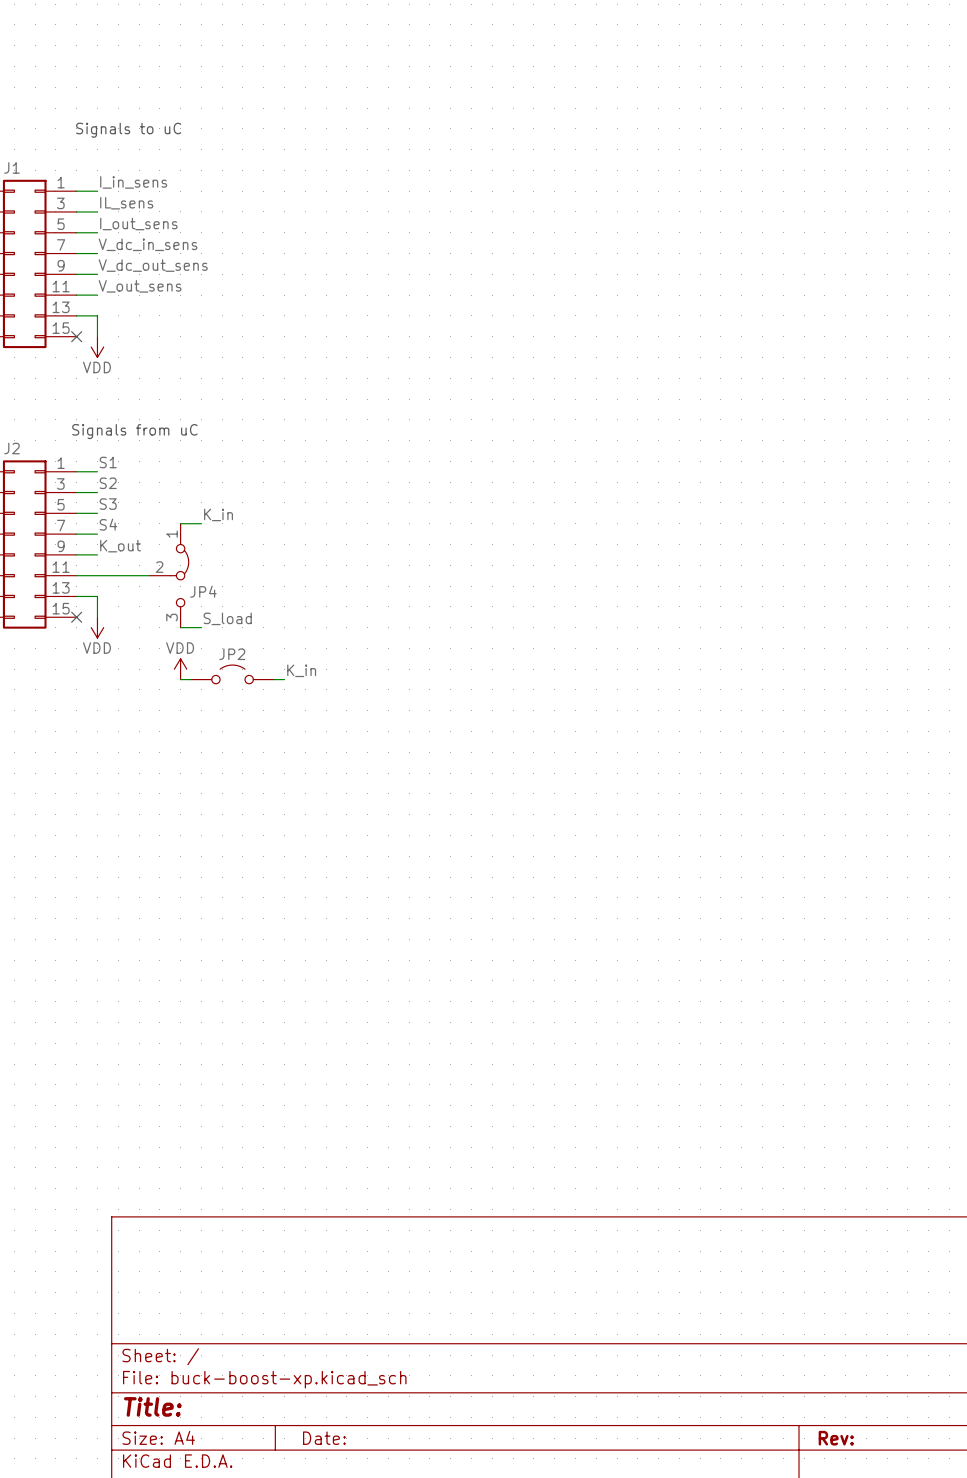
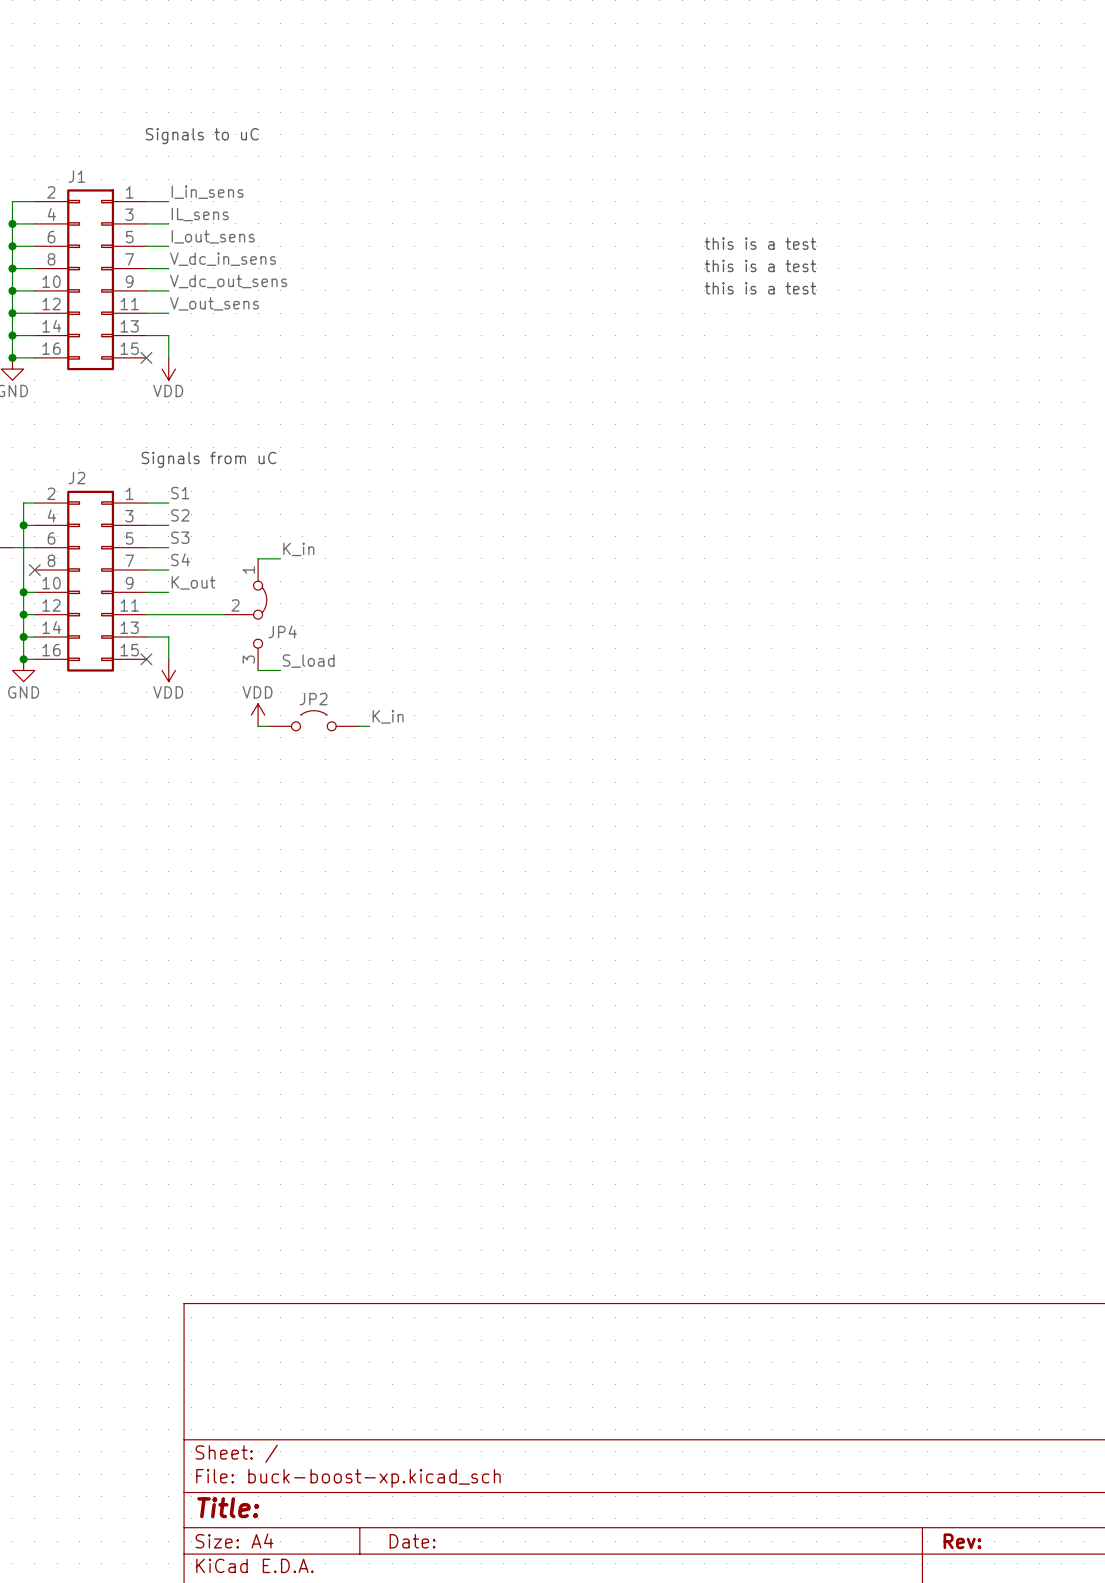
text: none -> this is a test (760, 243)
text: none -> this is a test (760, 265)
text: none -> this is a test (760, 288)

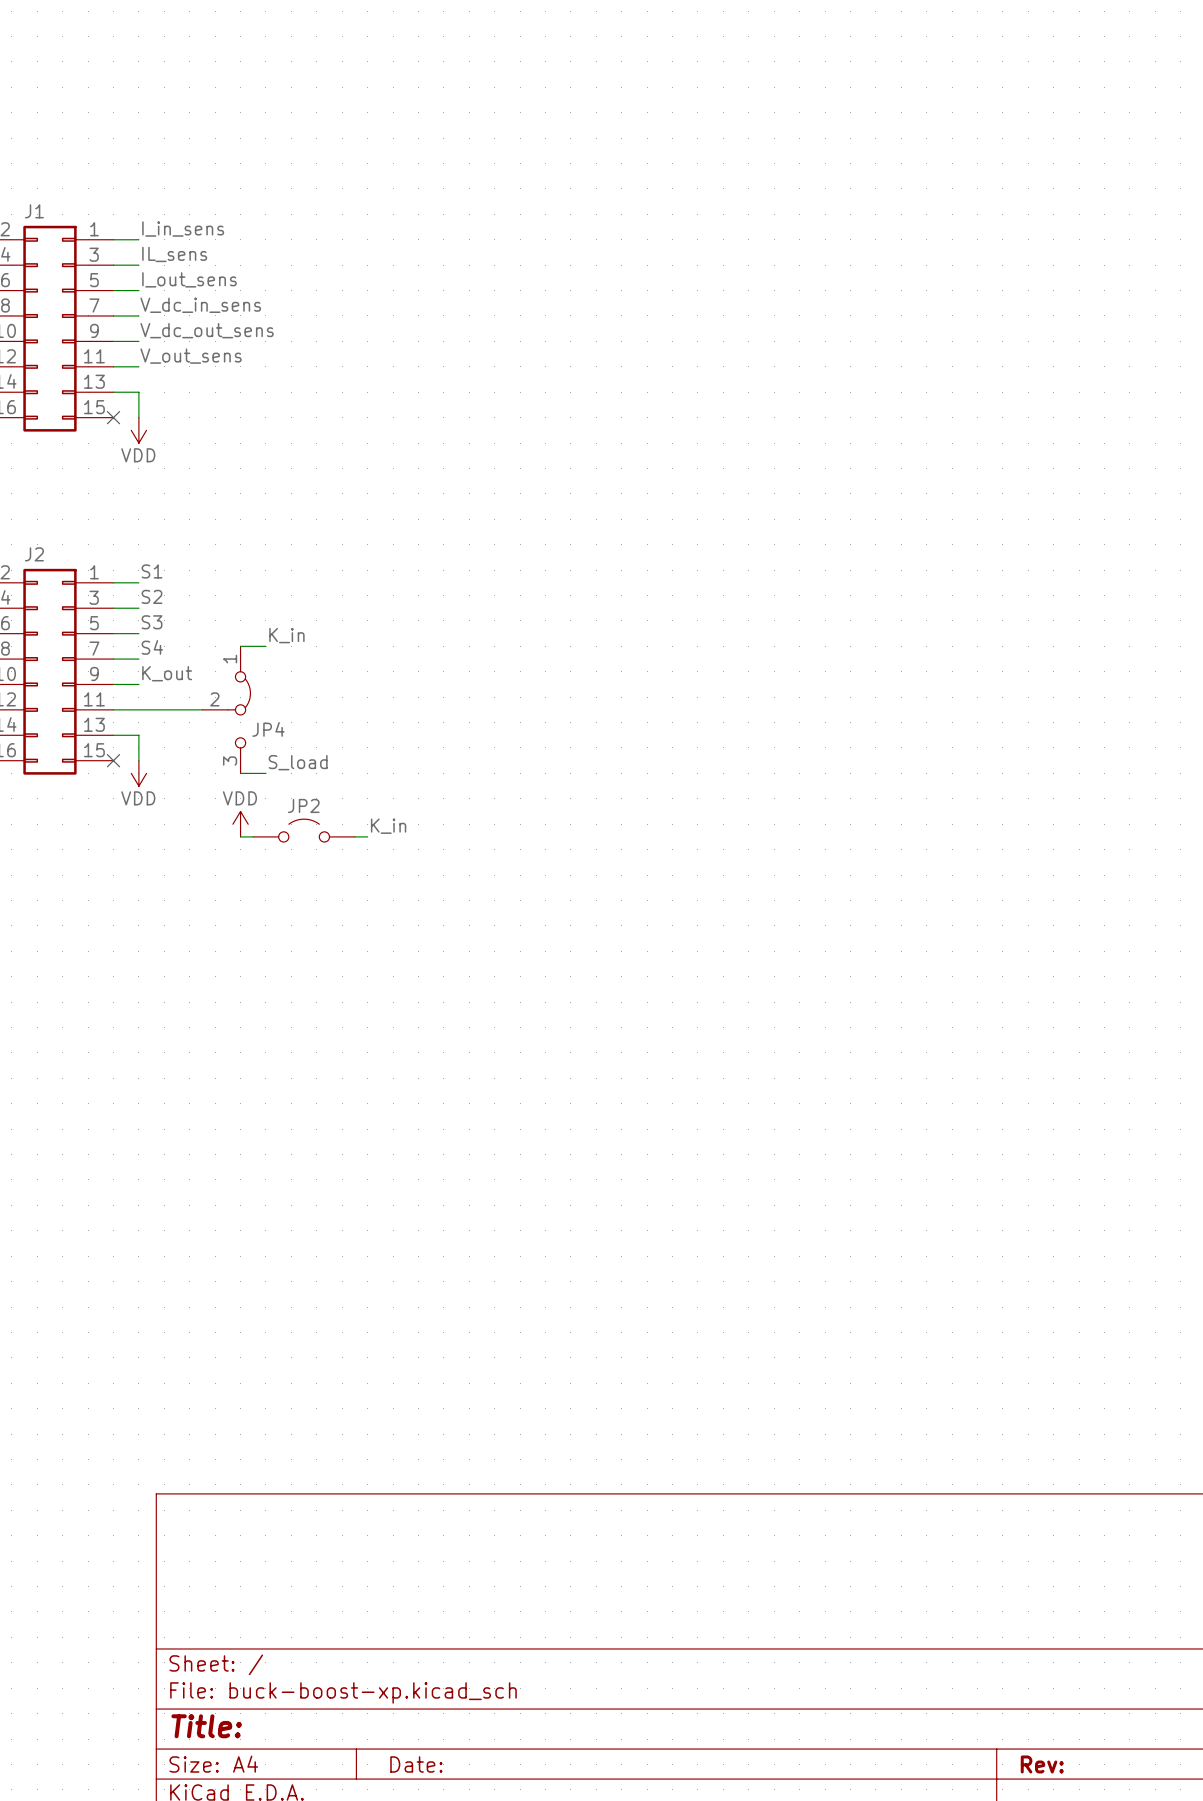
text: Signals to uC (202, 136) -> none
text: this is a test (760, 243) -> none
text: this is a test (760, 265) -> none
text: this is a test (760, 288) -> none
text: Signals from uC (208, 459) -> none

